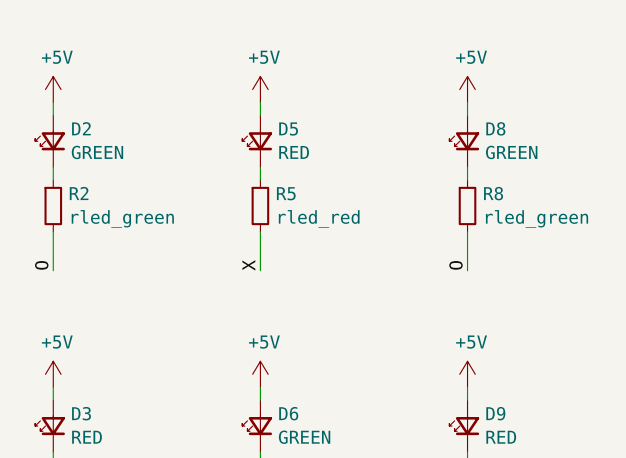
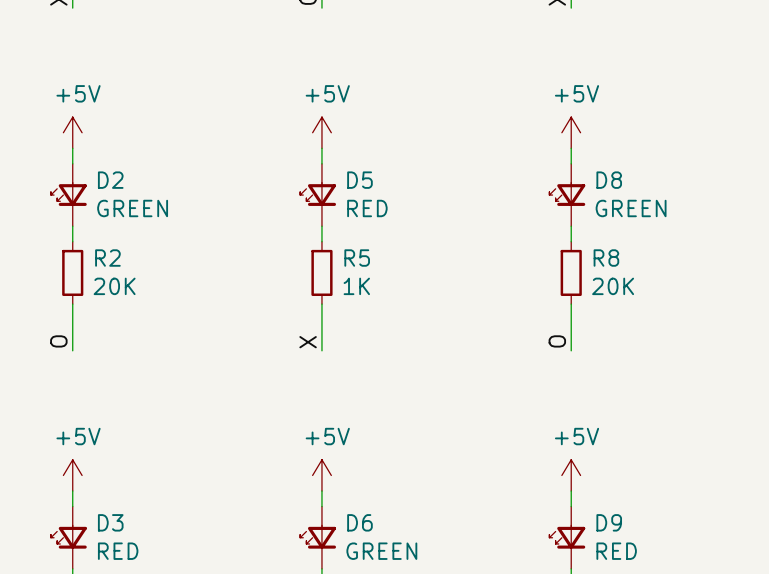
R2 value: rled_green (122, 218) -> 20K (114, 286)
R5 value: rled_red (319, 218) -> 1K (356, 286)
R8 value: rled_green (537, 218) -> 20K (613, 286)

